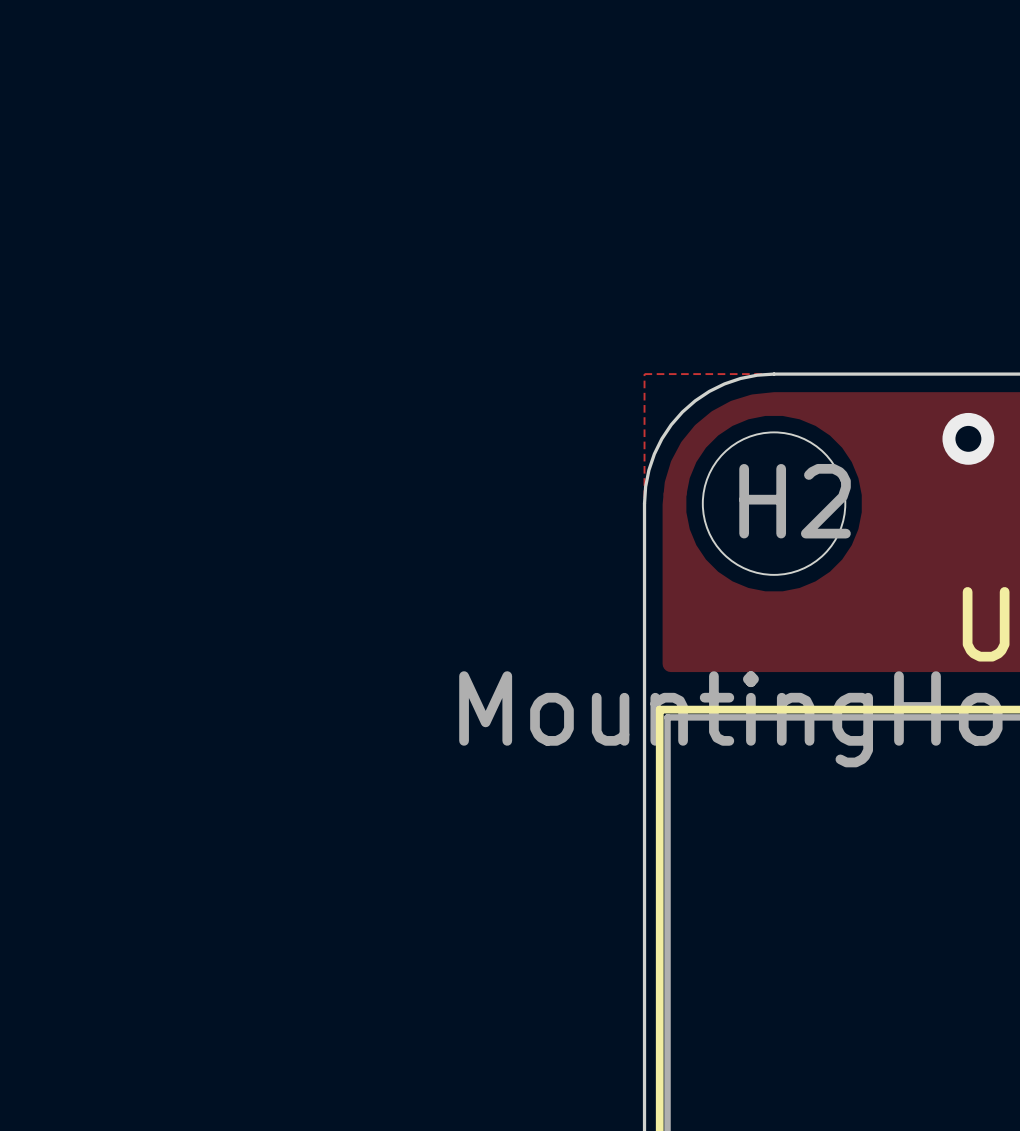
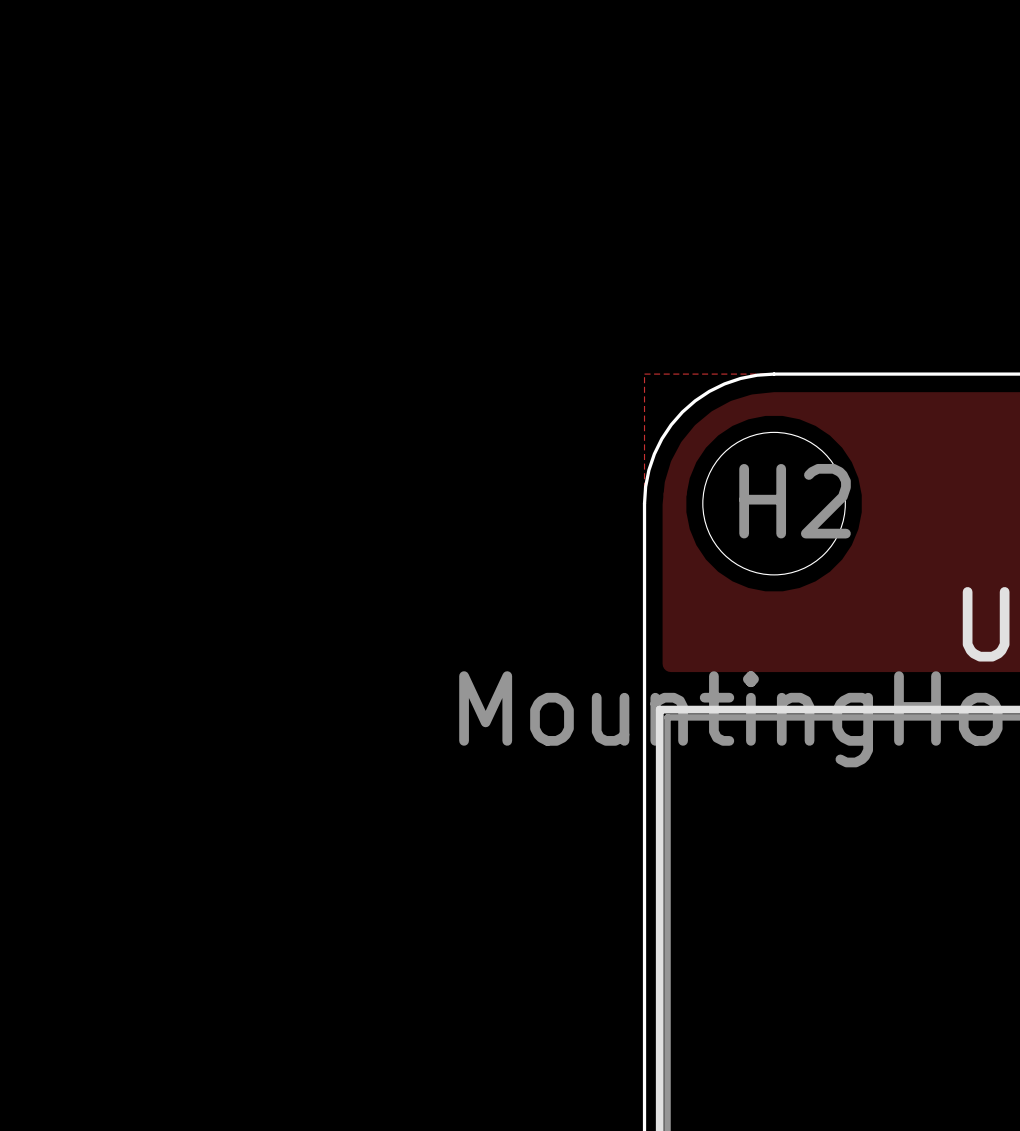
via: (968, 438) -> none

